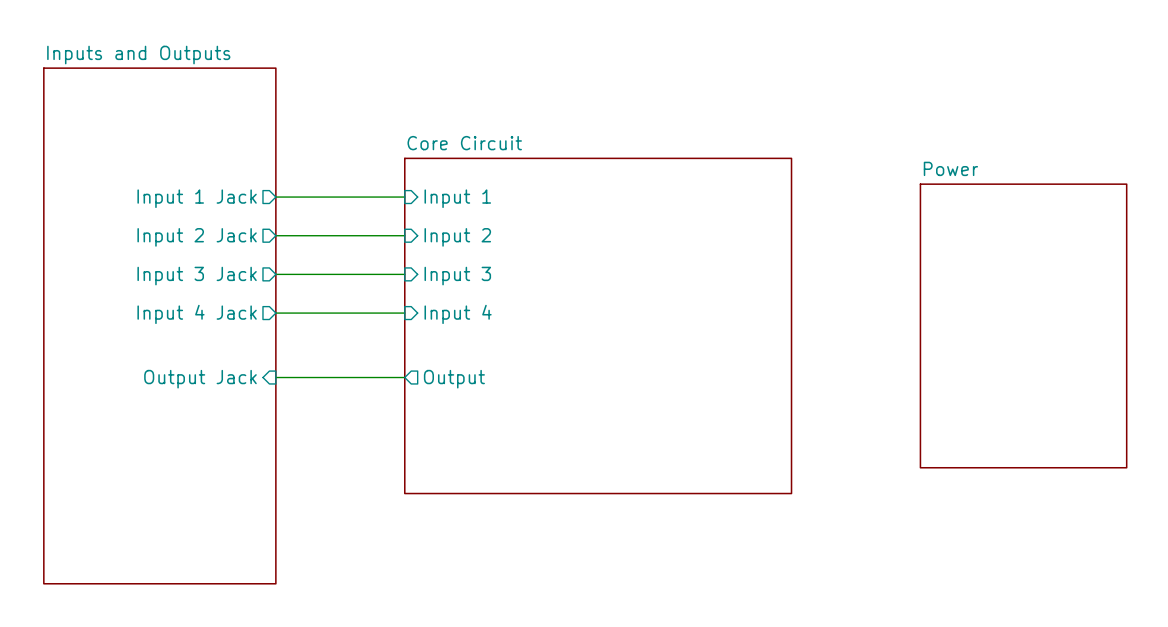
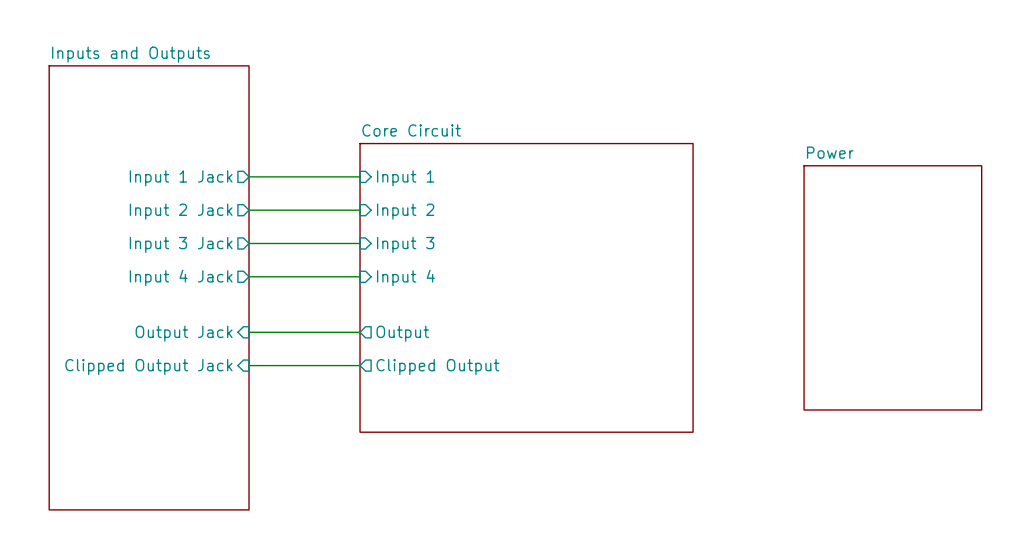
wire: none -> (249, 365) (360, 365)
sheet pin: none -> Clipped Output Jack (148, 367)
sheet pin: none -> Clipped Output (437, 367)

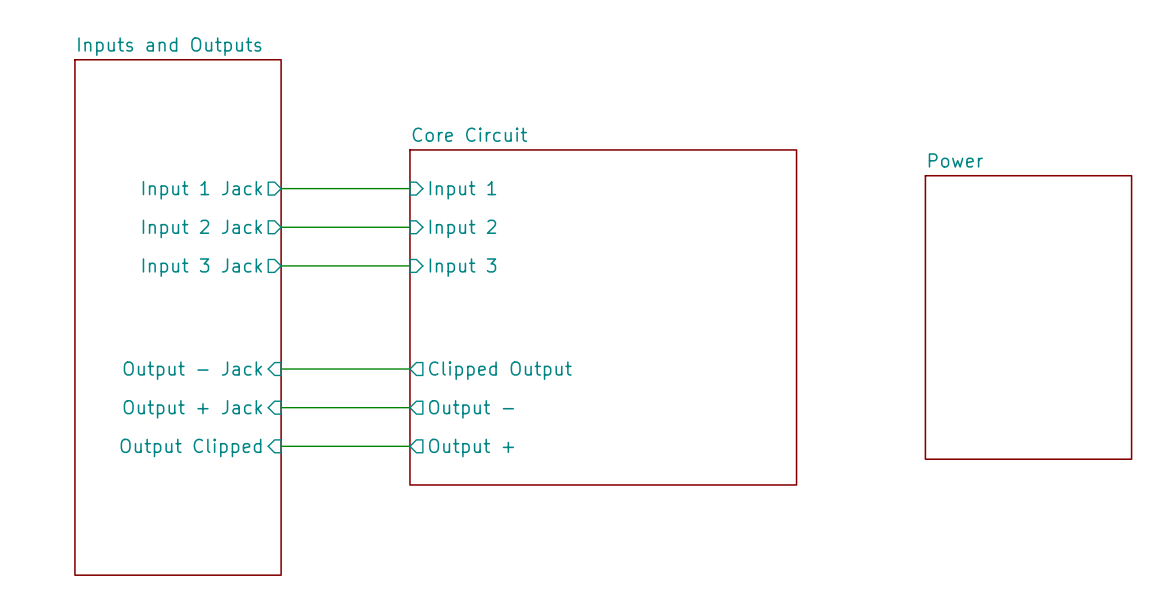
wire: (249, 276) (360, 276) -> (281, 446) (409, 446)
sheet pin: Input 4 Jack (181, 277) -> none
sheet pin: Input 4 (405, 277) -> none
sheet Inputs and Outputs: (149, 287) -> none
sheet Inputs and Outputs: none -> (178, 317)
sheet pin: Output Jack (184, 333) -> Output - Jack (192, 370)
sheet pin: Output (402, 333) -> Clipped Output (500, 370)
sheet pin: Clipped Output Jack (148, 367) -> Output + Jack (192, 409)
sheet pin: Clipped Output (437, 367) -> Output - (471, 409)
sheet pin: none -> Output Clipped (191, 447)
sheet pin: none -> Output + (471, 447)

